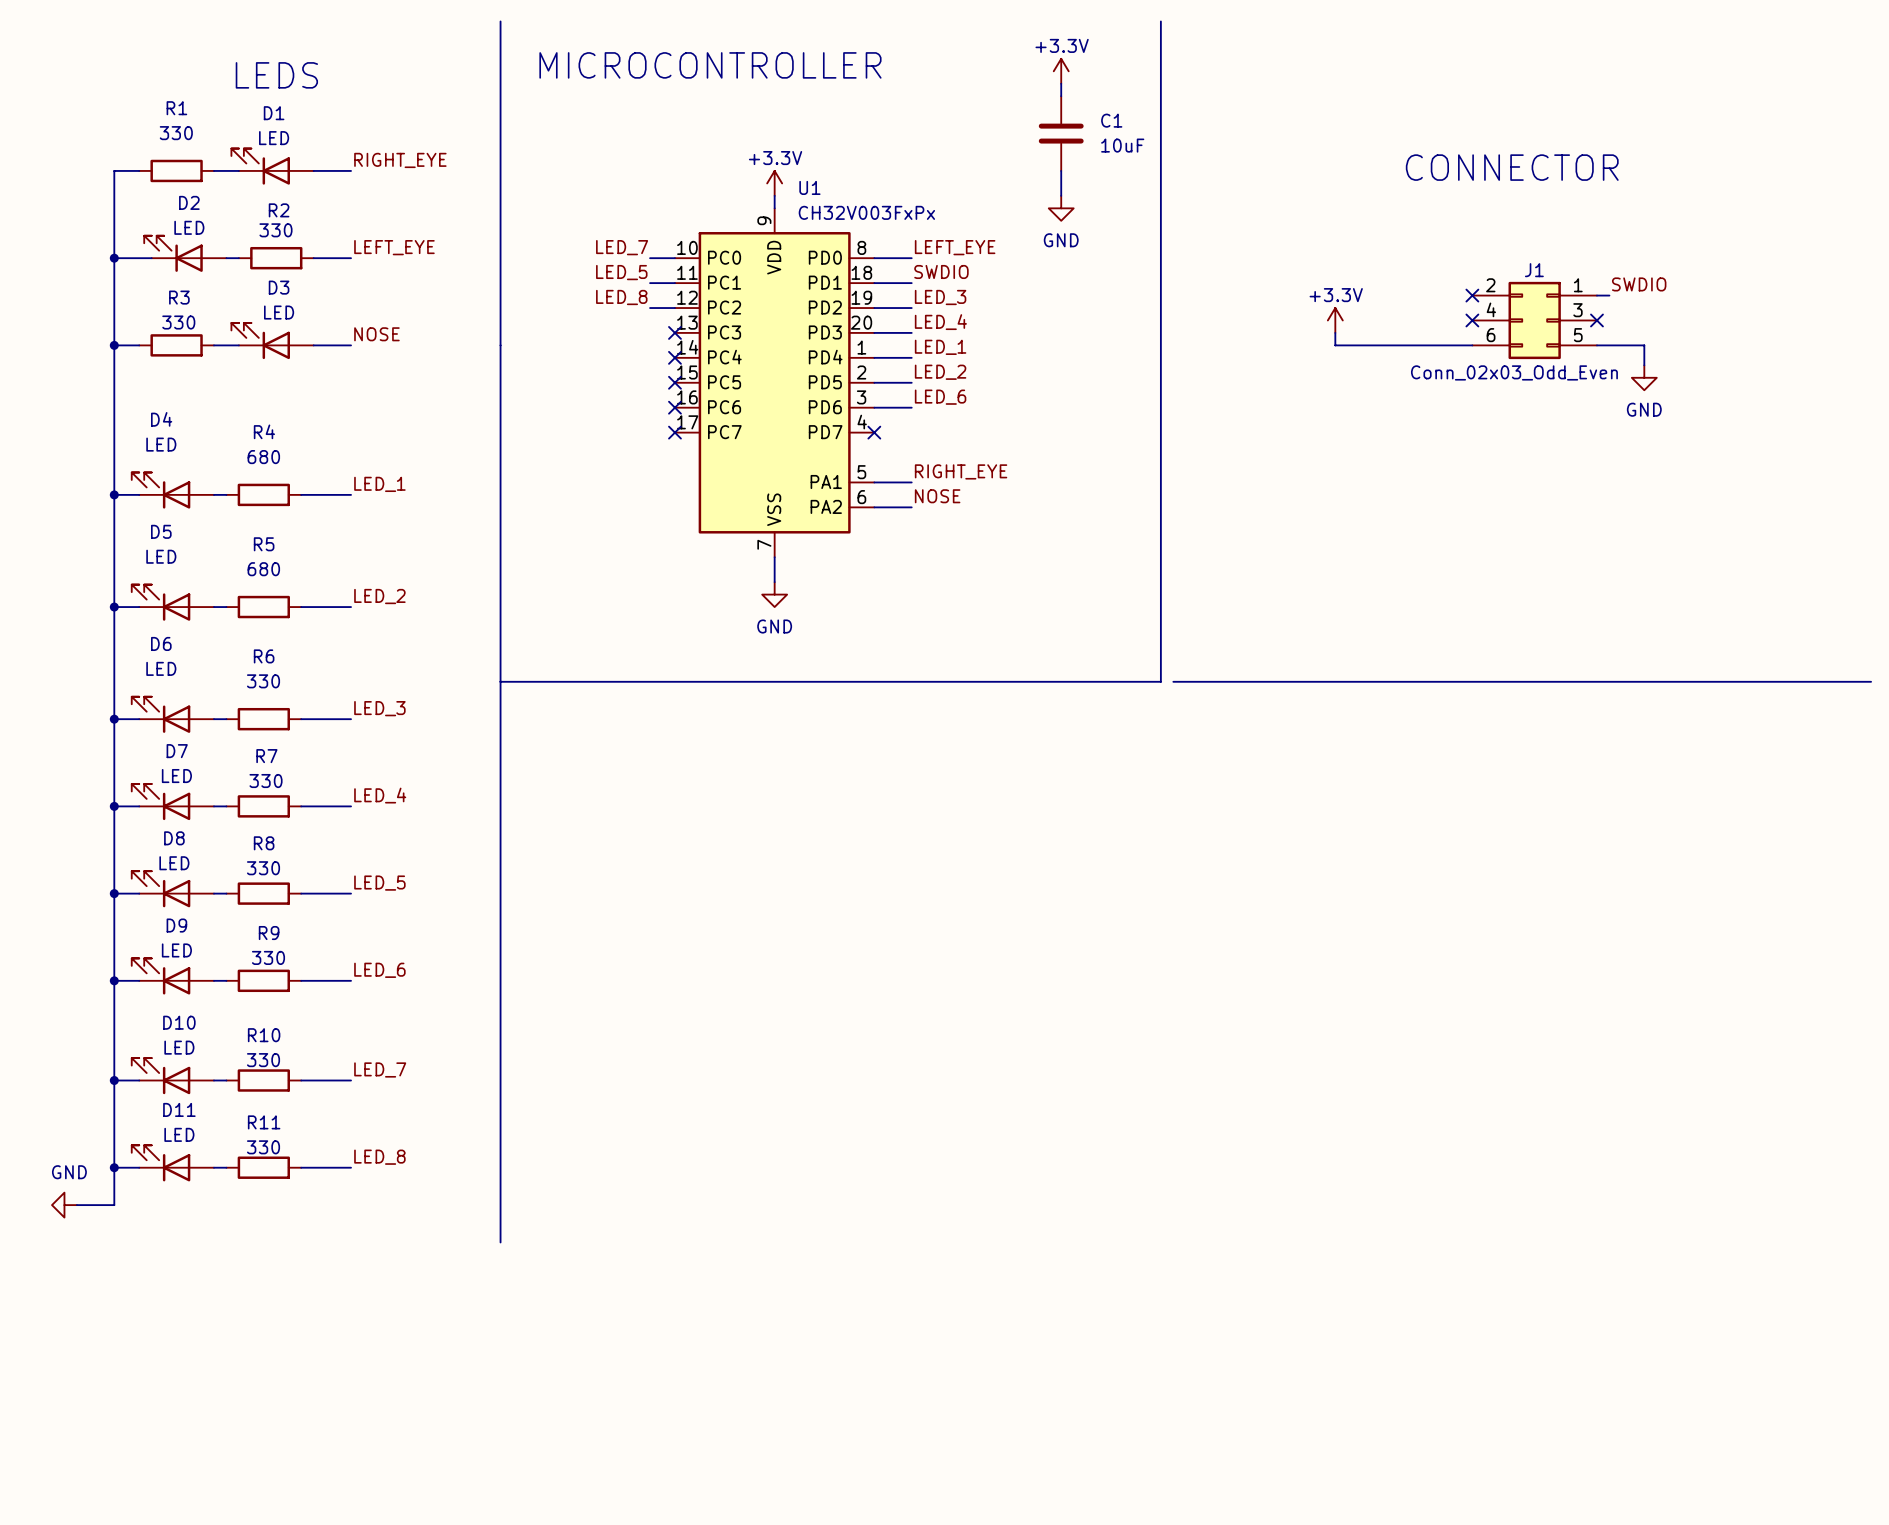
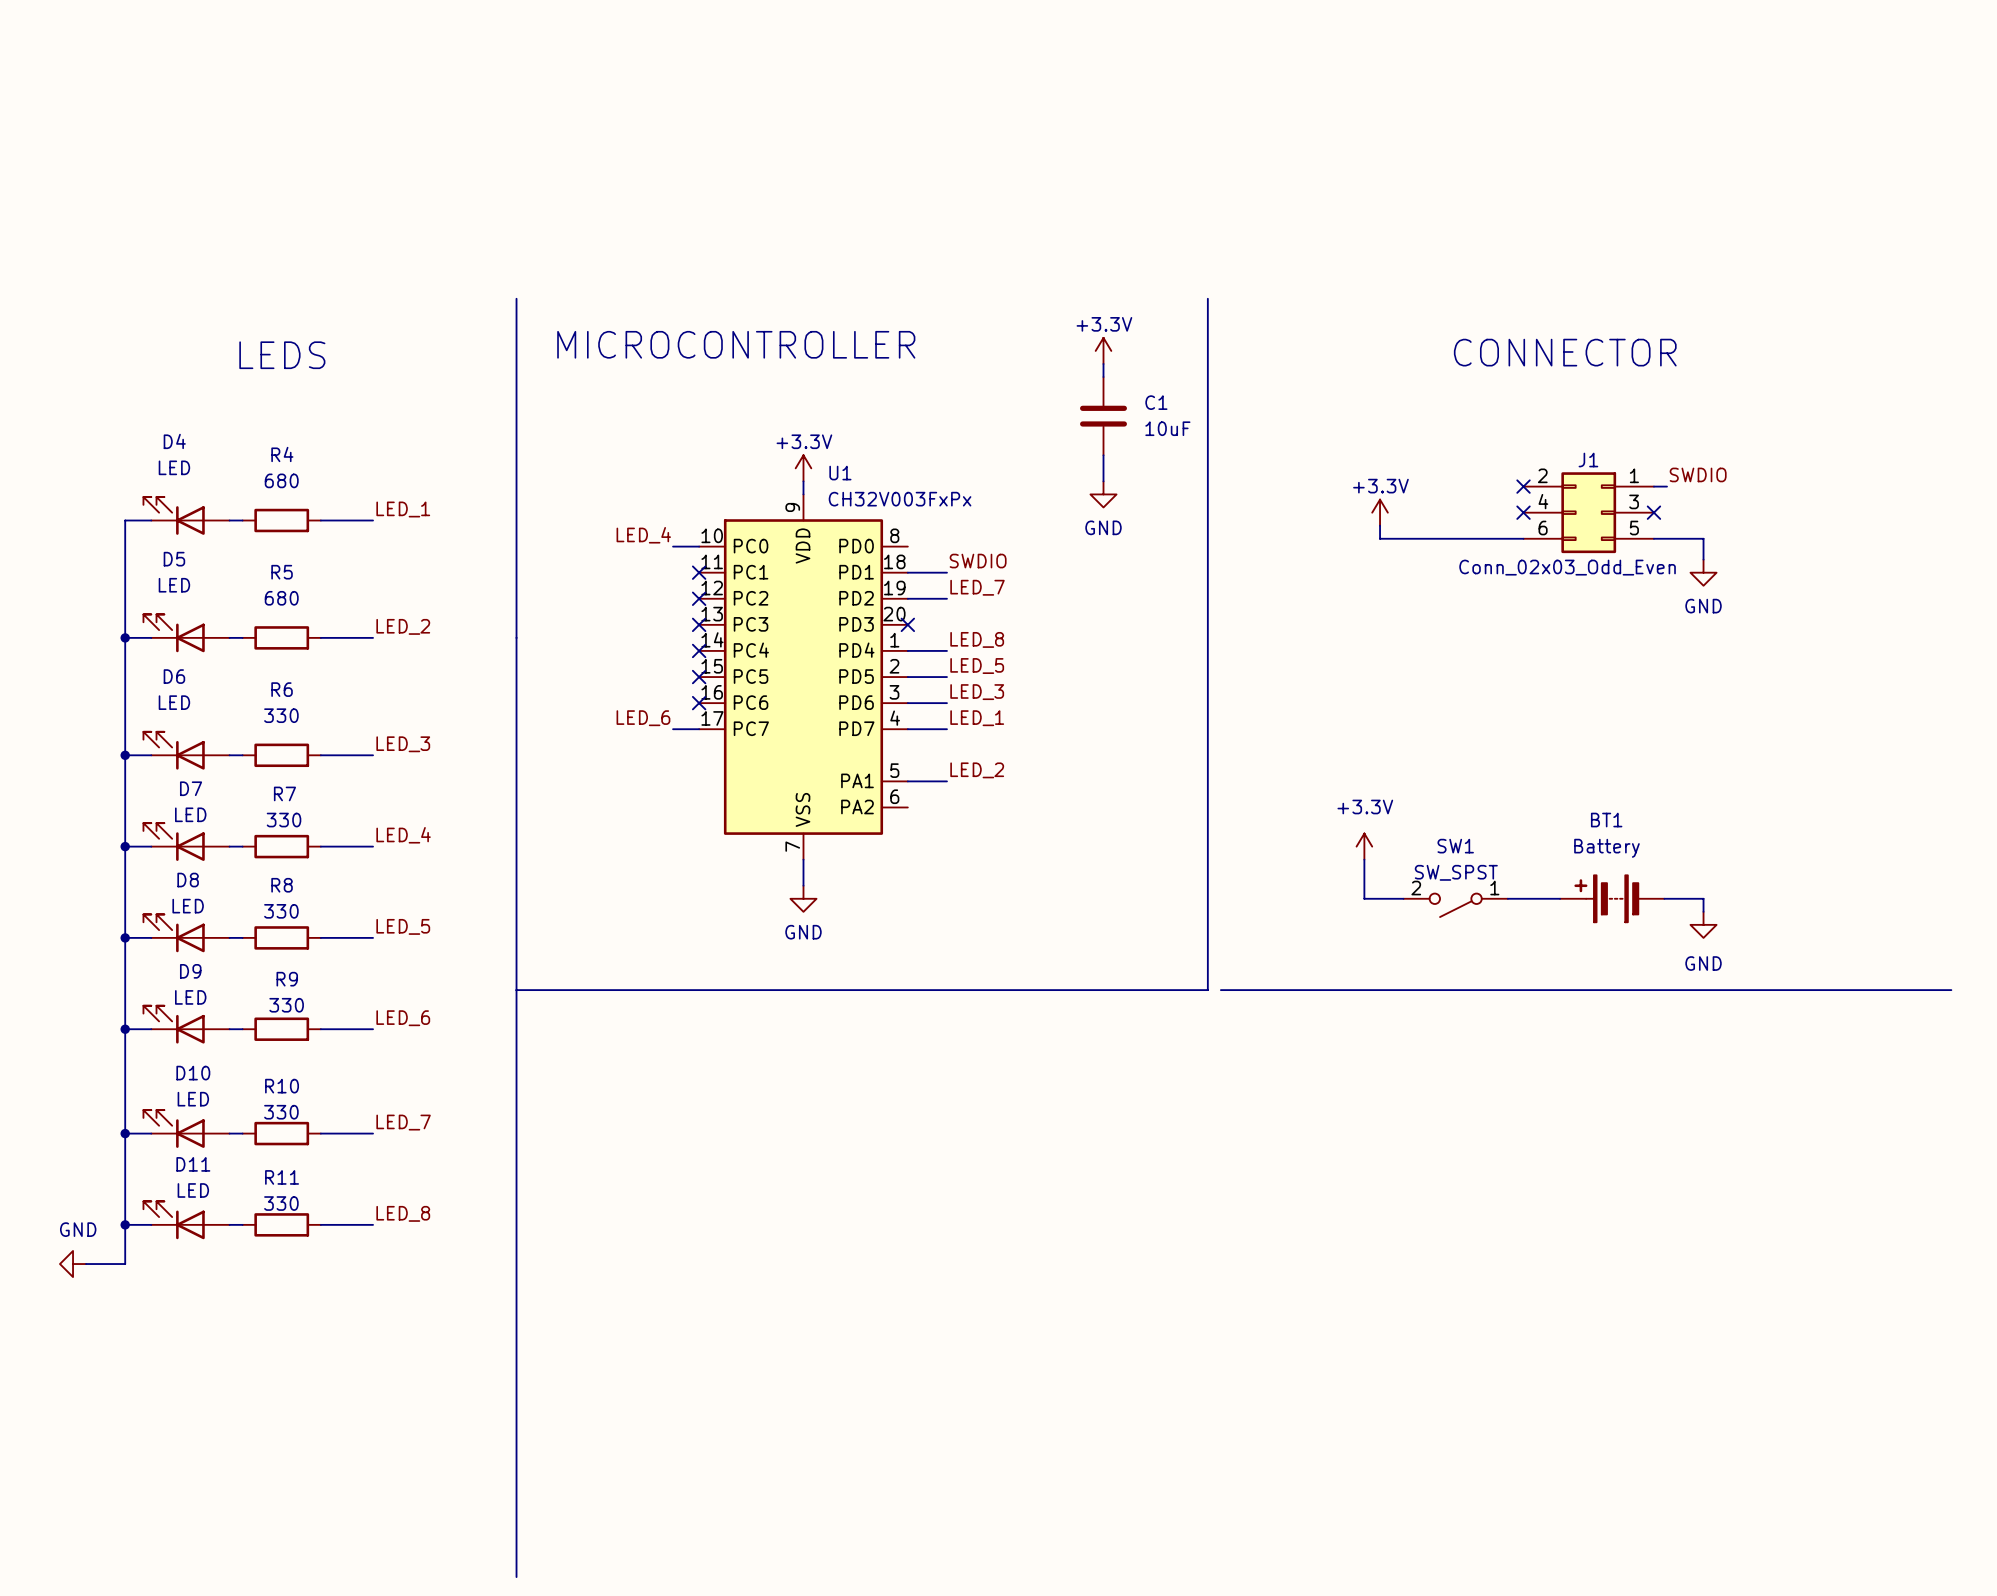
line: (500, 21) (500, 1242) -> none
line: (1160, 21) (1160, 681) (500, 681) -> none
text: MICROCONTROLLER (710, 65) -> none
power symbol: +3.3V (1061, 71) -> none
text: LEDS (276, 75) -> none
wire: (1061, 83) (1061, 96) -> none
C1 position: (1061, 133) -> (1103, 416)
label: RIGHT_EYE (400, 160) -> none
D1: LED (272, 166) -> none
text position: CONNECTOR (1512, 167) -> CONNECTOR (1565, 352)
wire: (139, 170) (114, 170) (114, 494) -> none
R1: 330 (176, 170) -> none
wire: (213, 170) (238, 170) -> none
wire: (313, 170) (351, 170) -> none
wire: (1061, 170) (1061, 195) -> none
power symbol: +3.3V (774, 183) -> none
wire: (774, 195) (774, 208) -> none
power symbol: GND (1061, 208) -> none
label: LEFT_EYE (394, 247) -> none
label: LED_7 (622, 247) -> none
label: LEFT_EYE (955, 247) -> none
D2: LED (185, 253) -> none
wire: (114, 258) (151, 258) -> none
junction: (114, 258) -> none
wire: (226, 258) (238, 258) -> none
R2: 330 (276, 258) -> none
wire: (313, 258) (351, 258) -> none
wire: (650, 258) (674, 258) -> none
wire: (874, 258) (911, 258) -> none
label: SWDIO (941, 271) -> none
label: LED_5 (621, 272) -> none
line: none -> (516, 298) (516, 1577)
wire: (650, 283) (674, 283) -> (673, 546) (699, 546)
wire: (874, 283) (911, 283) -> none
line: none -> (1207, 298) (1207, 990) (516, 990)
label position: SWDIO (1639, 284) -> SWDIO (1698, 474)
no-connect mark: (1472, 295) -> none
wire: (1596, 295) (1609, 295) -> (1653, 486) (1667, 486)
label: LED_8 (621, 297) -> none
label: LED_3 (940, 297) -> none
wire: (650, 308) (674, 308) -> none
wire: (874, 308) (911, 308) -> (907, 572) (946, 572)
power symbol: +3.3V (1335, 320) -> none
no-connect mark: (1472, 320) -> none
J1 position: (1534, 320) -> (1588, 512)
no-connect mark: (1596, 320) -> none
label: LED_4 (940, 322) -> none
text: none -> MICROCONTROLLER (736, 344)
no-connect mark: (674, 332) -> none
wire: (874, 332) (911, 332) -> (907, 598) (946, 598)
power symbol: none -> +3.3V (1103, 350)
wire: (1335, 332) (1335, 345) (1472, 345) -> (1380, 525) (1380, 538) (1523, 538)
label: NOSE (376, 334) -> none
text: none -> LEDS (282, 355)
D3: LED (272, 341) -> none
wire: (114, 345) (139, 345) -> none
junction: (114, 345) -> none
R3: 330 (176, 345) -> none
wire: (213, 345) (238, 345) -> none
wire: (313, 345) (351, 345) -> none
wire: none -> (1103, 363) (1103, 377)
wire: (1596, 345) (1644, 345) (1644, 365) -> (1653, 538) (1703, 538) (1703, 559)
label: LED_1 (940, 347) -> none
no-connect mark: (674, 357) -> none
wire: (874, 357) (911, 357) -> none
label: LED_2 (940, 372) -> none
power symbol position: GND (1644, 377) -> GND (1703, 572)
no-connect mark: (674, 382) -> none
U1 position: (774, 382) -> (803, 677)
wire: (874, 382) (911, 382) -> (907, 650) (946, 650)
label: LED_6 (940, 397) -> none
no-connect mark: (674, 407) -> none
wire: (874, 407) (911, 407) -> (907, 677) (946, 677)
no-connect mark: (674, 432) -> none
no-connect mark: (874, 432) -> none
wire: none -> (1103, 455) (1103, 481)
power symbol: none -> +3.3V (803, 468)
no-connect mark: none -> (1523, 486)
power symbol: none -> GND (1103, 494)
label: RIGHT_EYE (961, 471) -> none
wire: (874, 482) (911, 482) -> (907, 729) (946, 729)
power symbol: none -> +3.3V (1380, 512)
no-connect mark: none -> (1523, 512)
no-connect mark: none -> (1653, 512)
junction: (114, 494) -> none
label: NOSE (937, 496) -> none
wire: (874, 507) (911, 507) -> (907, 781) (946, 781)
label: none -> LED_4 (643, 535)
label: none -> SWDIO (978, 561)
no-connect mark: none -> (699, 572)
label: none -> LED_7 (977, 587)
no-connect mark: none -> (699, 598)
no-connect mark: none -> (699, 624)
power symbol: GND (774, 594) -> none
no-connect mark: none -> (907, 624)
label: none -> LED_8 (977, 639)
no-connect mark: none -> (699, 650)
label: none -> LED_5 (977, 666)
no-connect mark: none -> (699, 677)
label: none -> LED_3 (977, 692)
no-connect mark: none -> (699, 703)
wire: none -> (907, 703) (946, 703)
line: (1173, 681) (1871, 681) -> none
label: none -> LED_6 (643, 718)
label: none -> LED_1 (977, 718)
wire: none -> (673, 729) (699, 729)
label: none -> LED_2 (977, 770)
power symbol: none -> +3.3V (1364, 846)
wire: none -> (803, 859) (803, 885)
wire: none -> (1364, 859) (1364, 898) (1403, 898)
power symbol: none -> GND (803, 898)
wire: none -> (1507, 898) (1560, 898)
BT1: none -> Battery (1612, 898)
wire: none -> (1664, 898) (1703, 898) (1703, 911)
SW1: none -> SW_SPST (1455, 905)
power symbol: none -> GND (1703, 924)
line: none -> (1220, 990) (1951, 990)

